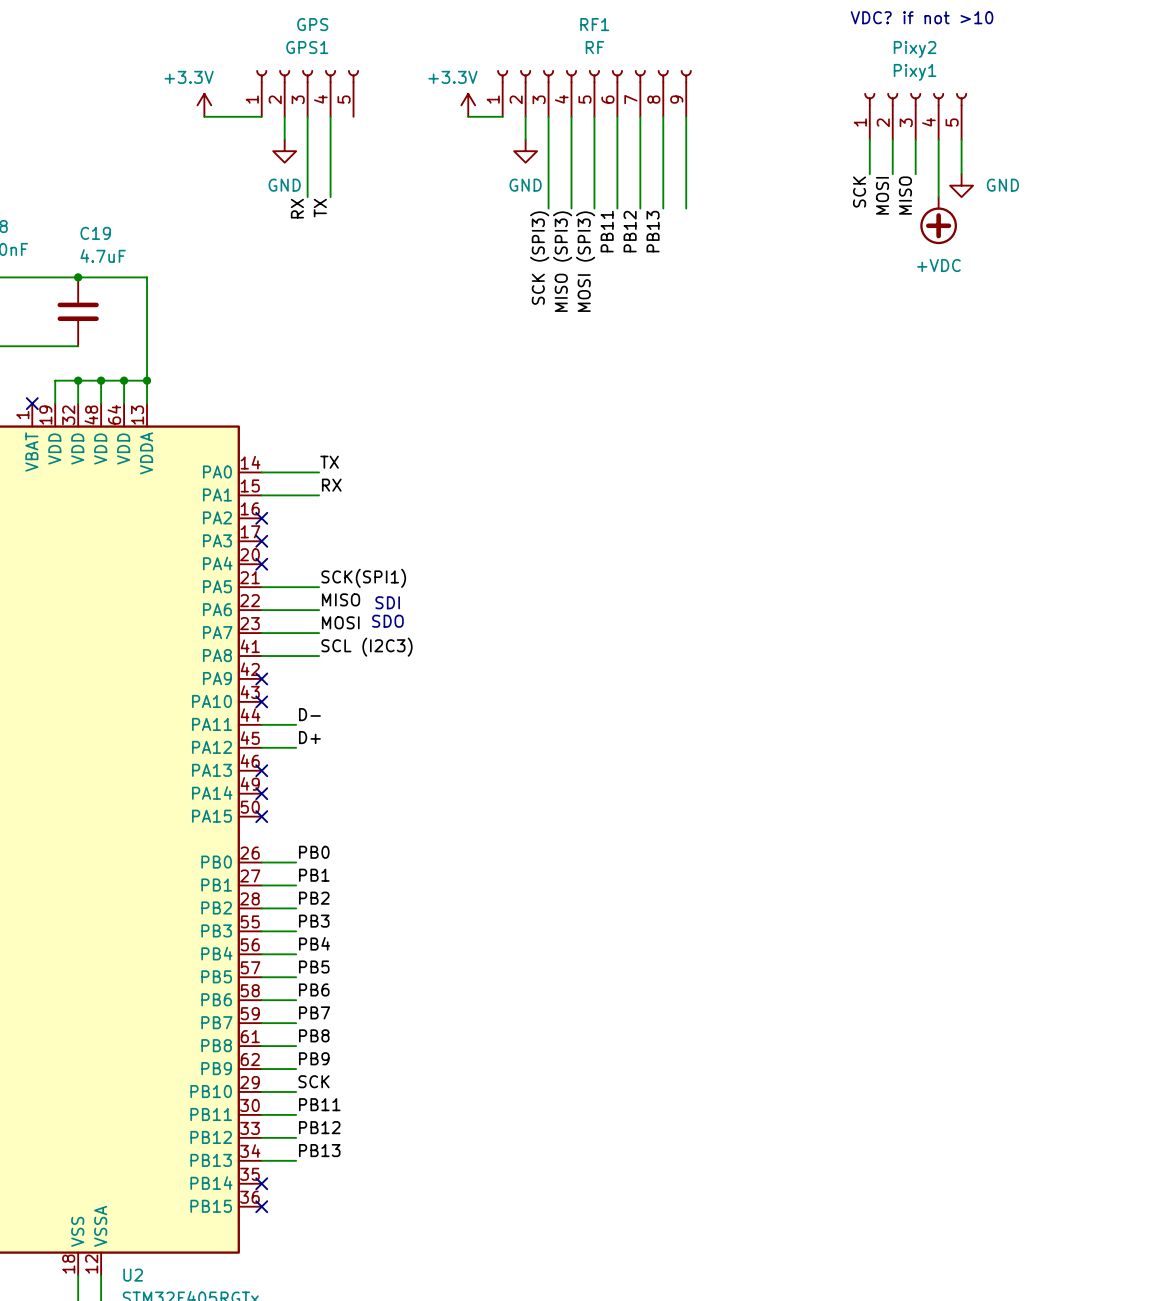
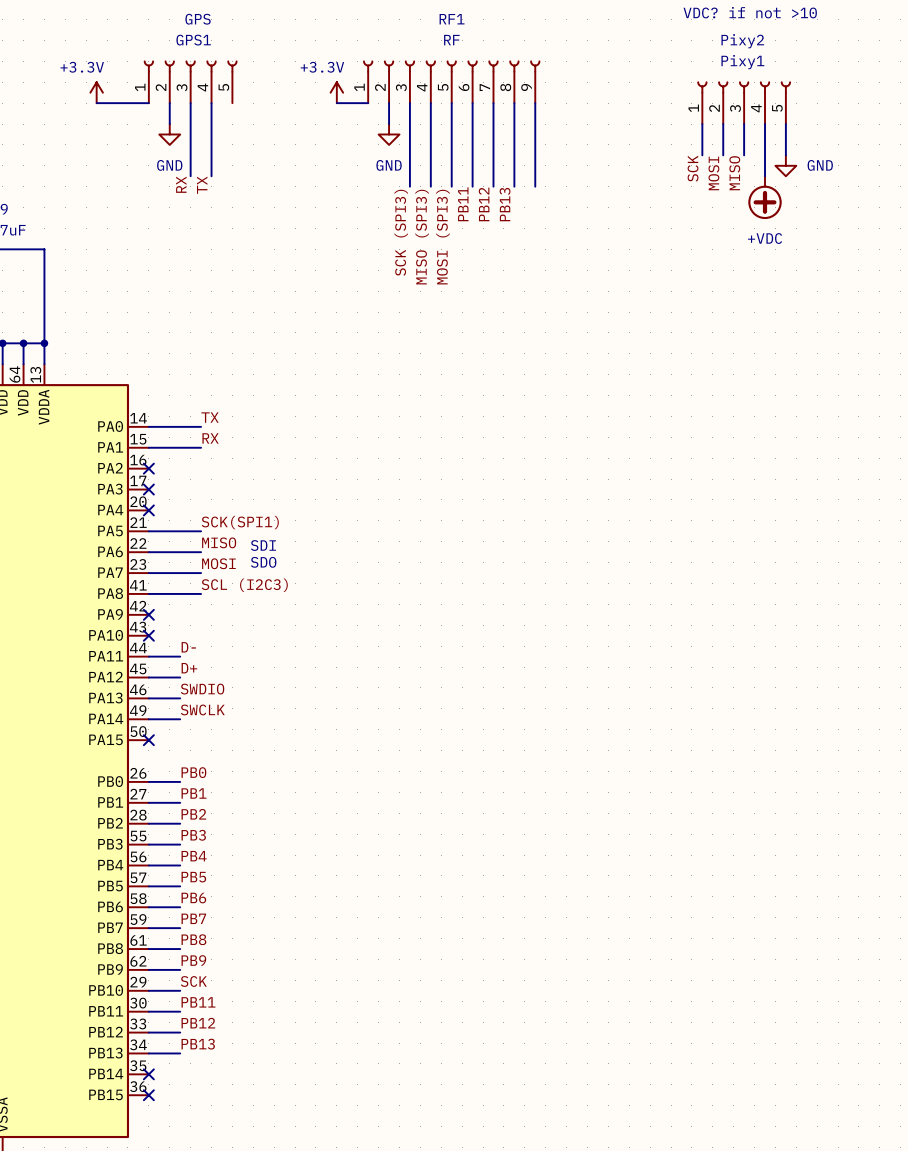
label: none -> SWDIO (202, 689)
wire: none -> (148, 698) (180, 698)
no-connect mark: (261, 770) -> none
label: none -> SWCLK (202, 709)
wire: none -> (148, 719) (180, 719)
no-connect mark: (261, 793) -> none

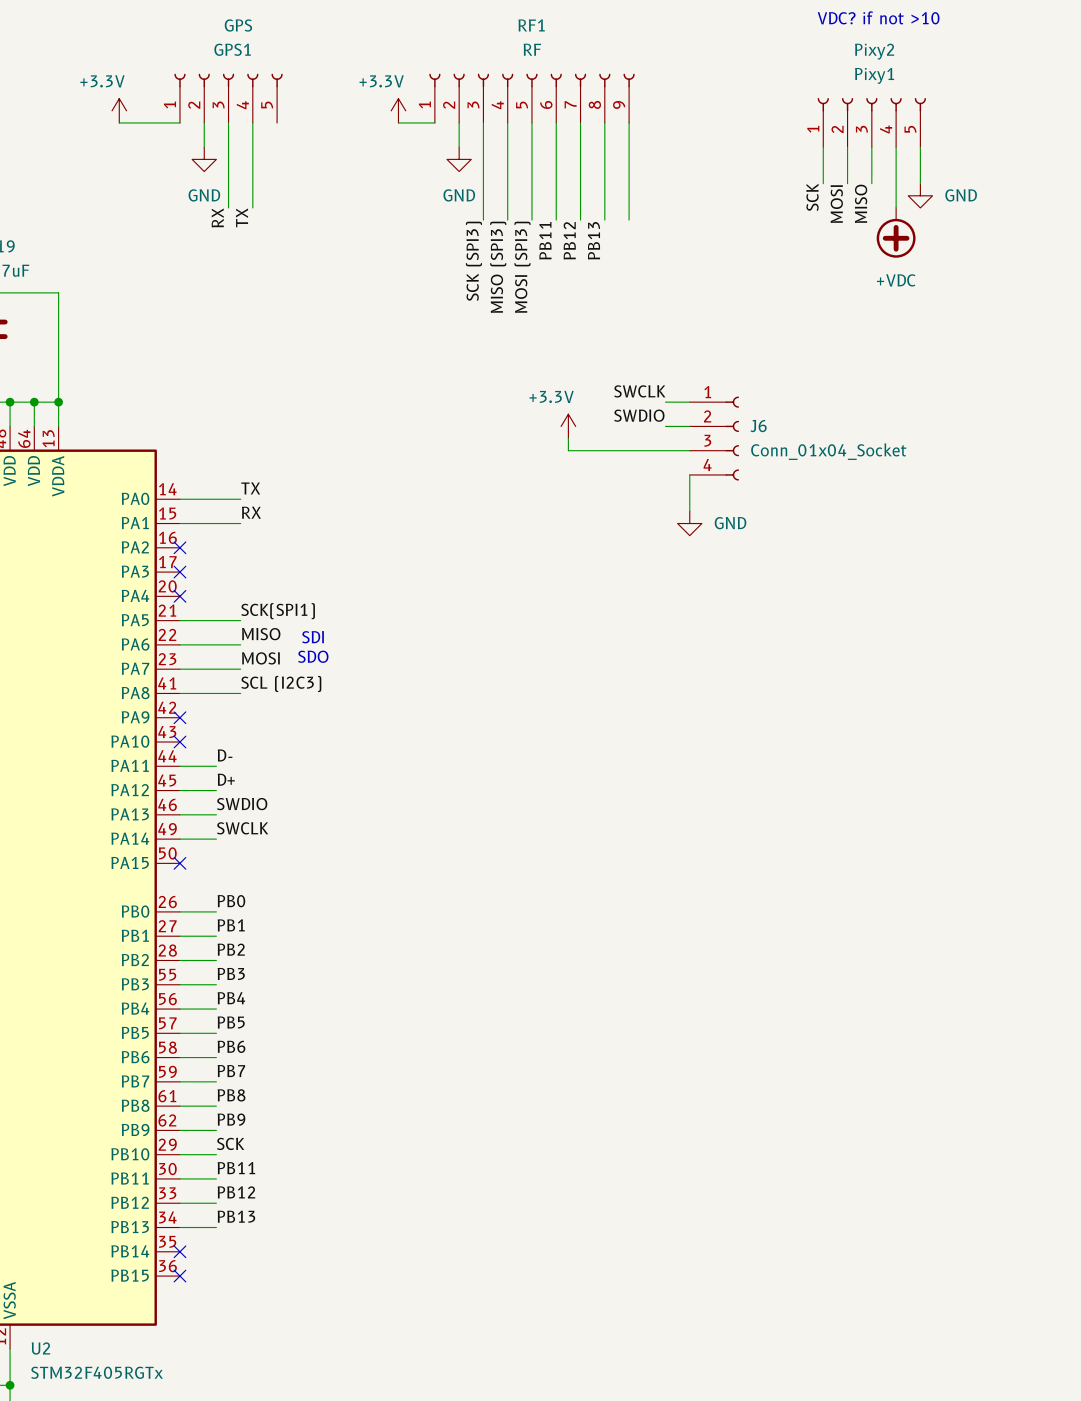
label: none -> SWCLK (639, 391)
wire: none -> (665, 402) (689, 402)
label: none -> SWDIO (639, 415)
power symbol: none -> +3.3V (568, 426)
wire: none -> (665, 426) (689, 426)
wire: none -> (568, 438) (568, 450) (689, 450)
J6: none -> Conn_01x04_Socket (714, 438)
wire: none -> (689, 474) (689, 511)
power symbol: none -> GND (689, 523)

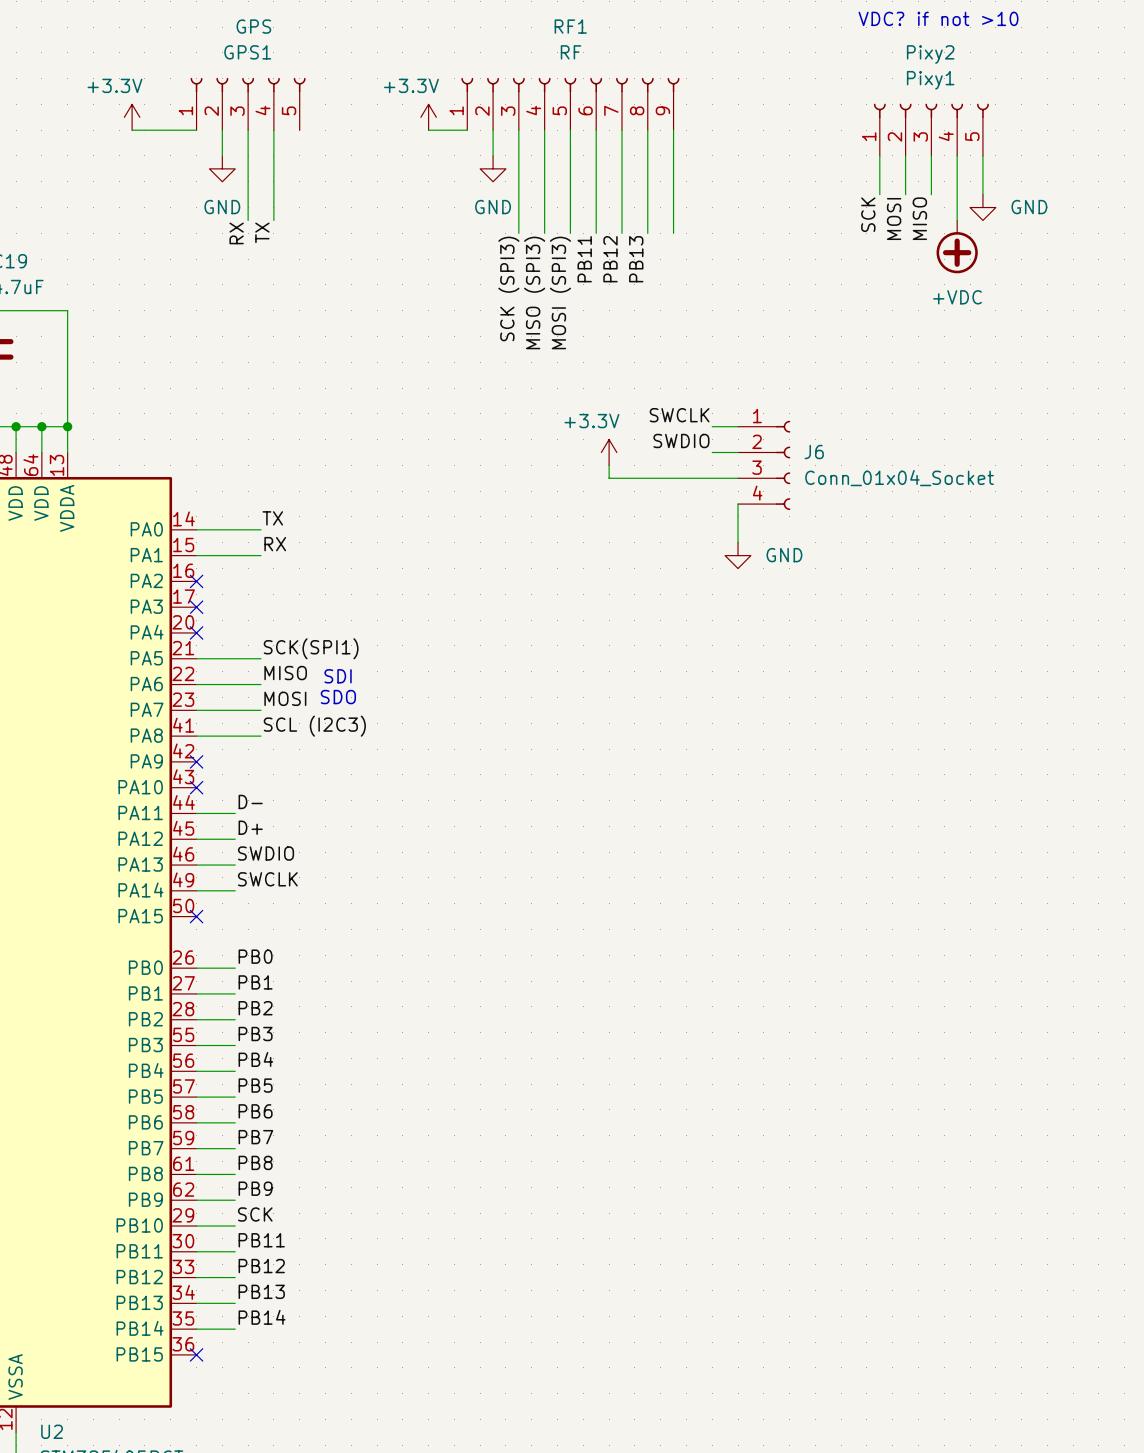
label: none -> PB14 (262, 1317)
wire: none -> (196, 1329) (235, 1329)
no-connect mark: (179, 1251) -> none

